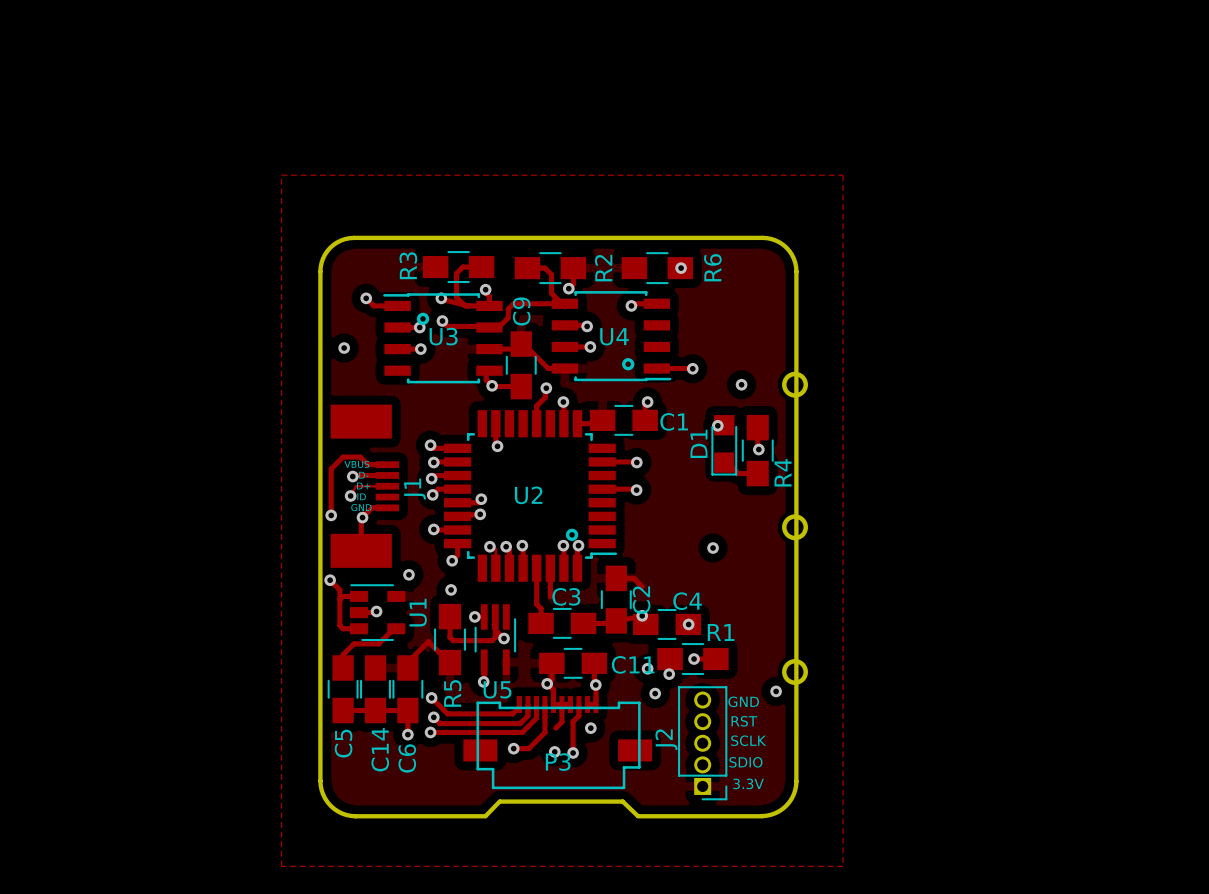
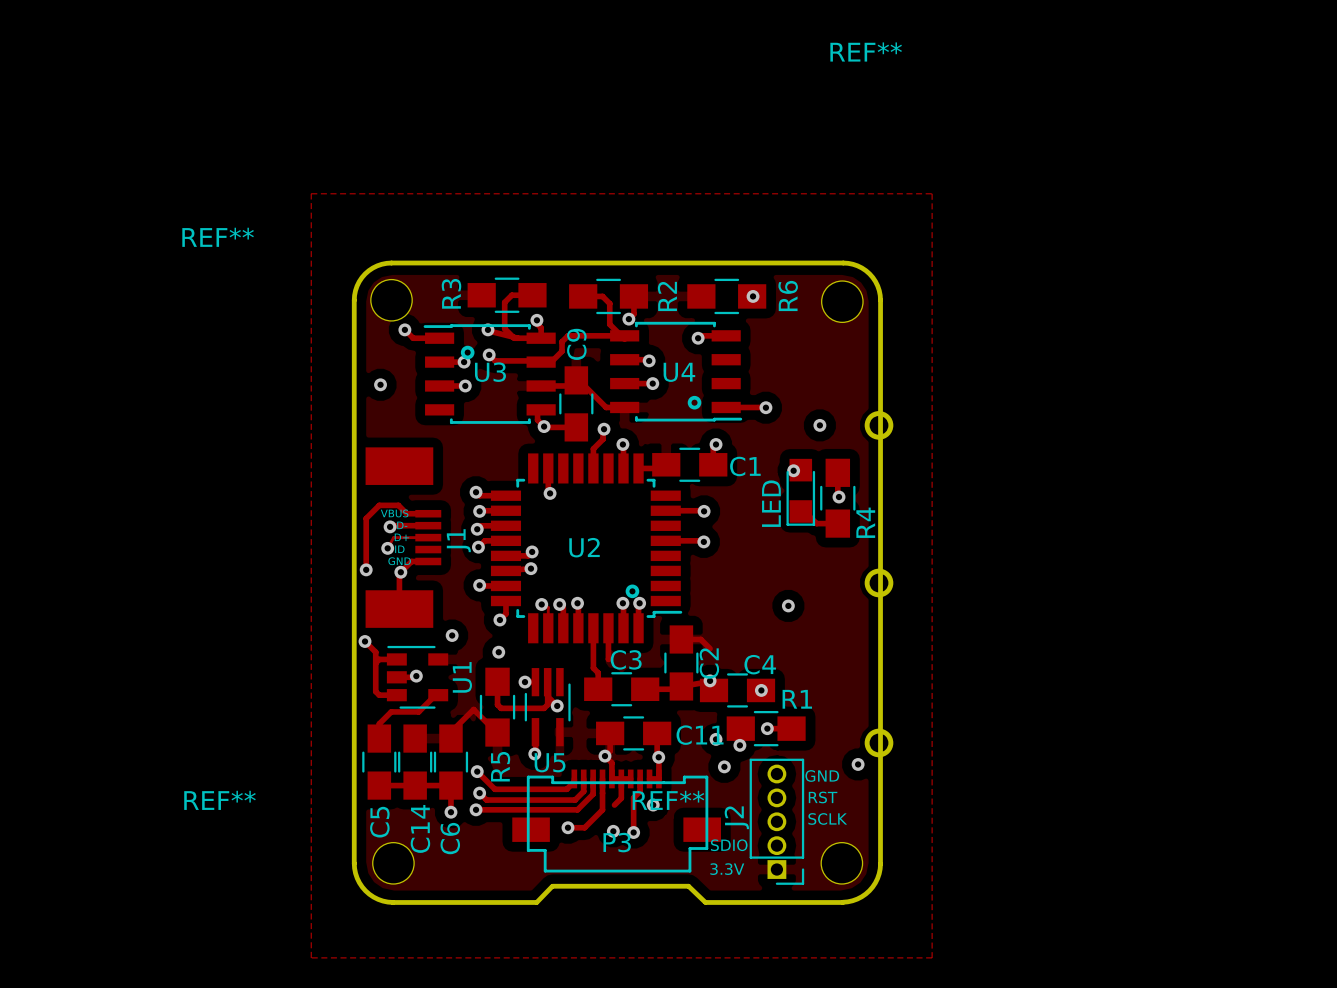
REF**: none -> (391, 300)
REF**: none -> (842, 301)
D1 name: D1 (698, 443) -> LED (771, 503)
text position: SDIO (745, 762) -> SDIO (729, 845)
REF**: none -> (393, 863)
REF**: none -> (841, 863)
text position: 3.3V (748, 783) -> 3.3V (727, 869)

